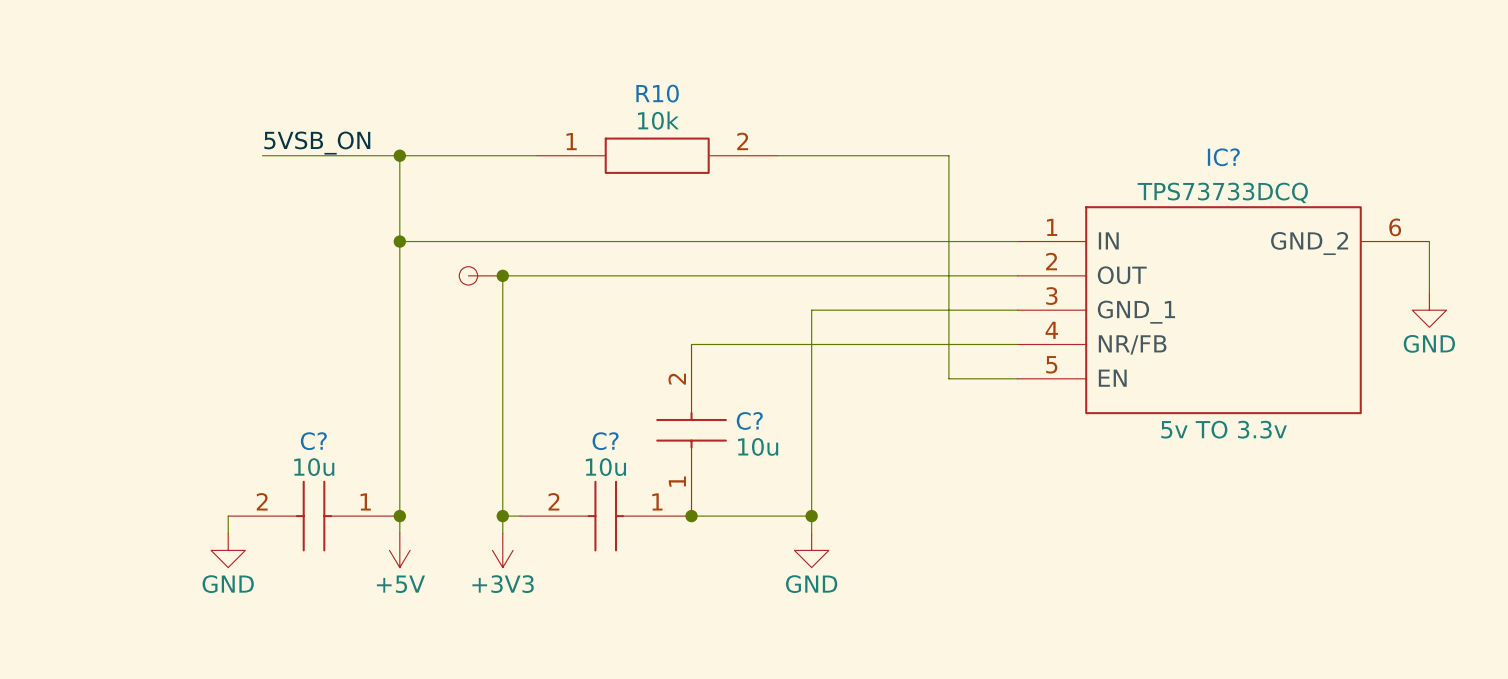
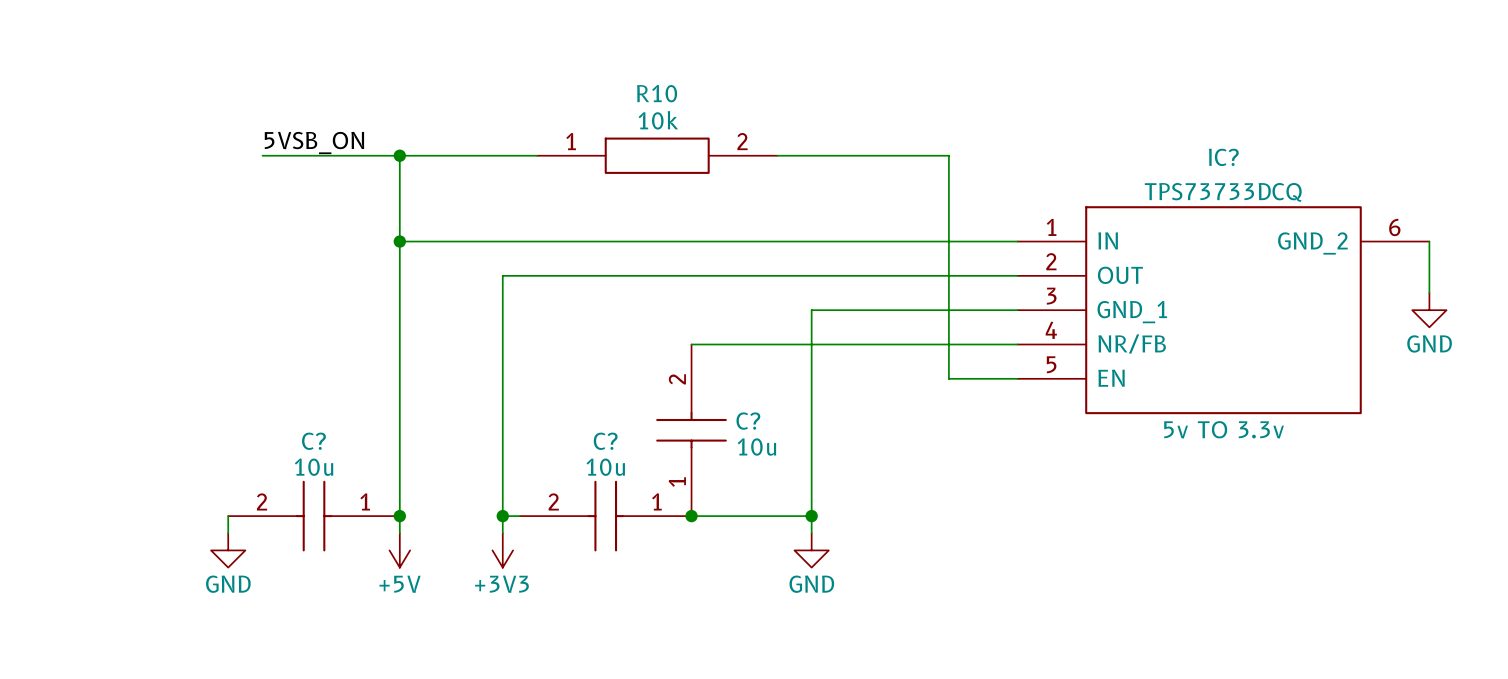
part: (481, 275) -> none
junction: (502, 275) -> none

